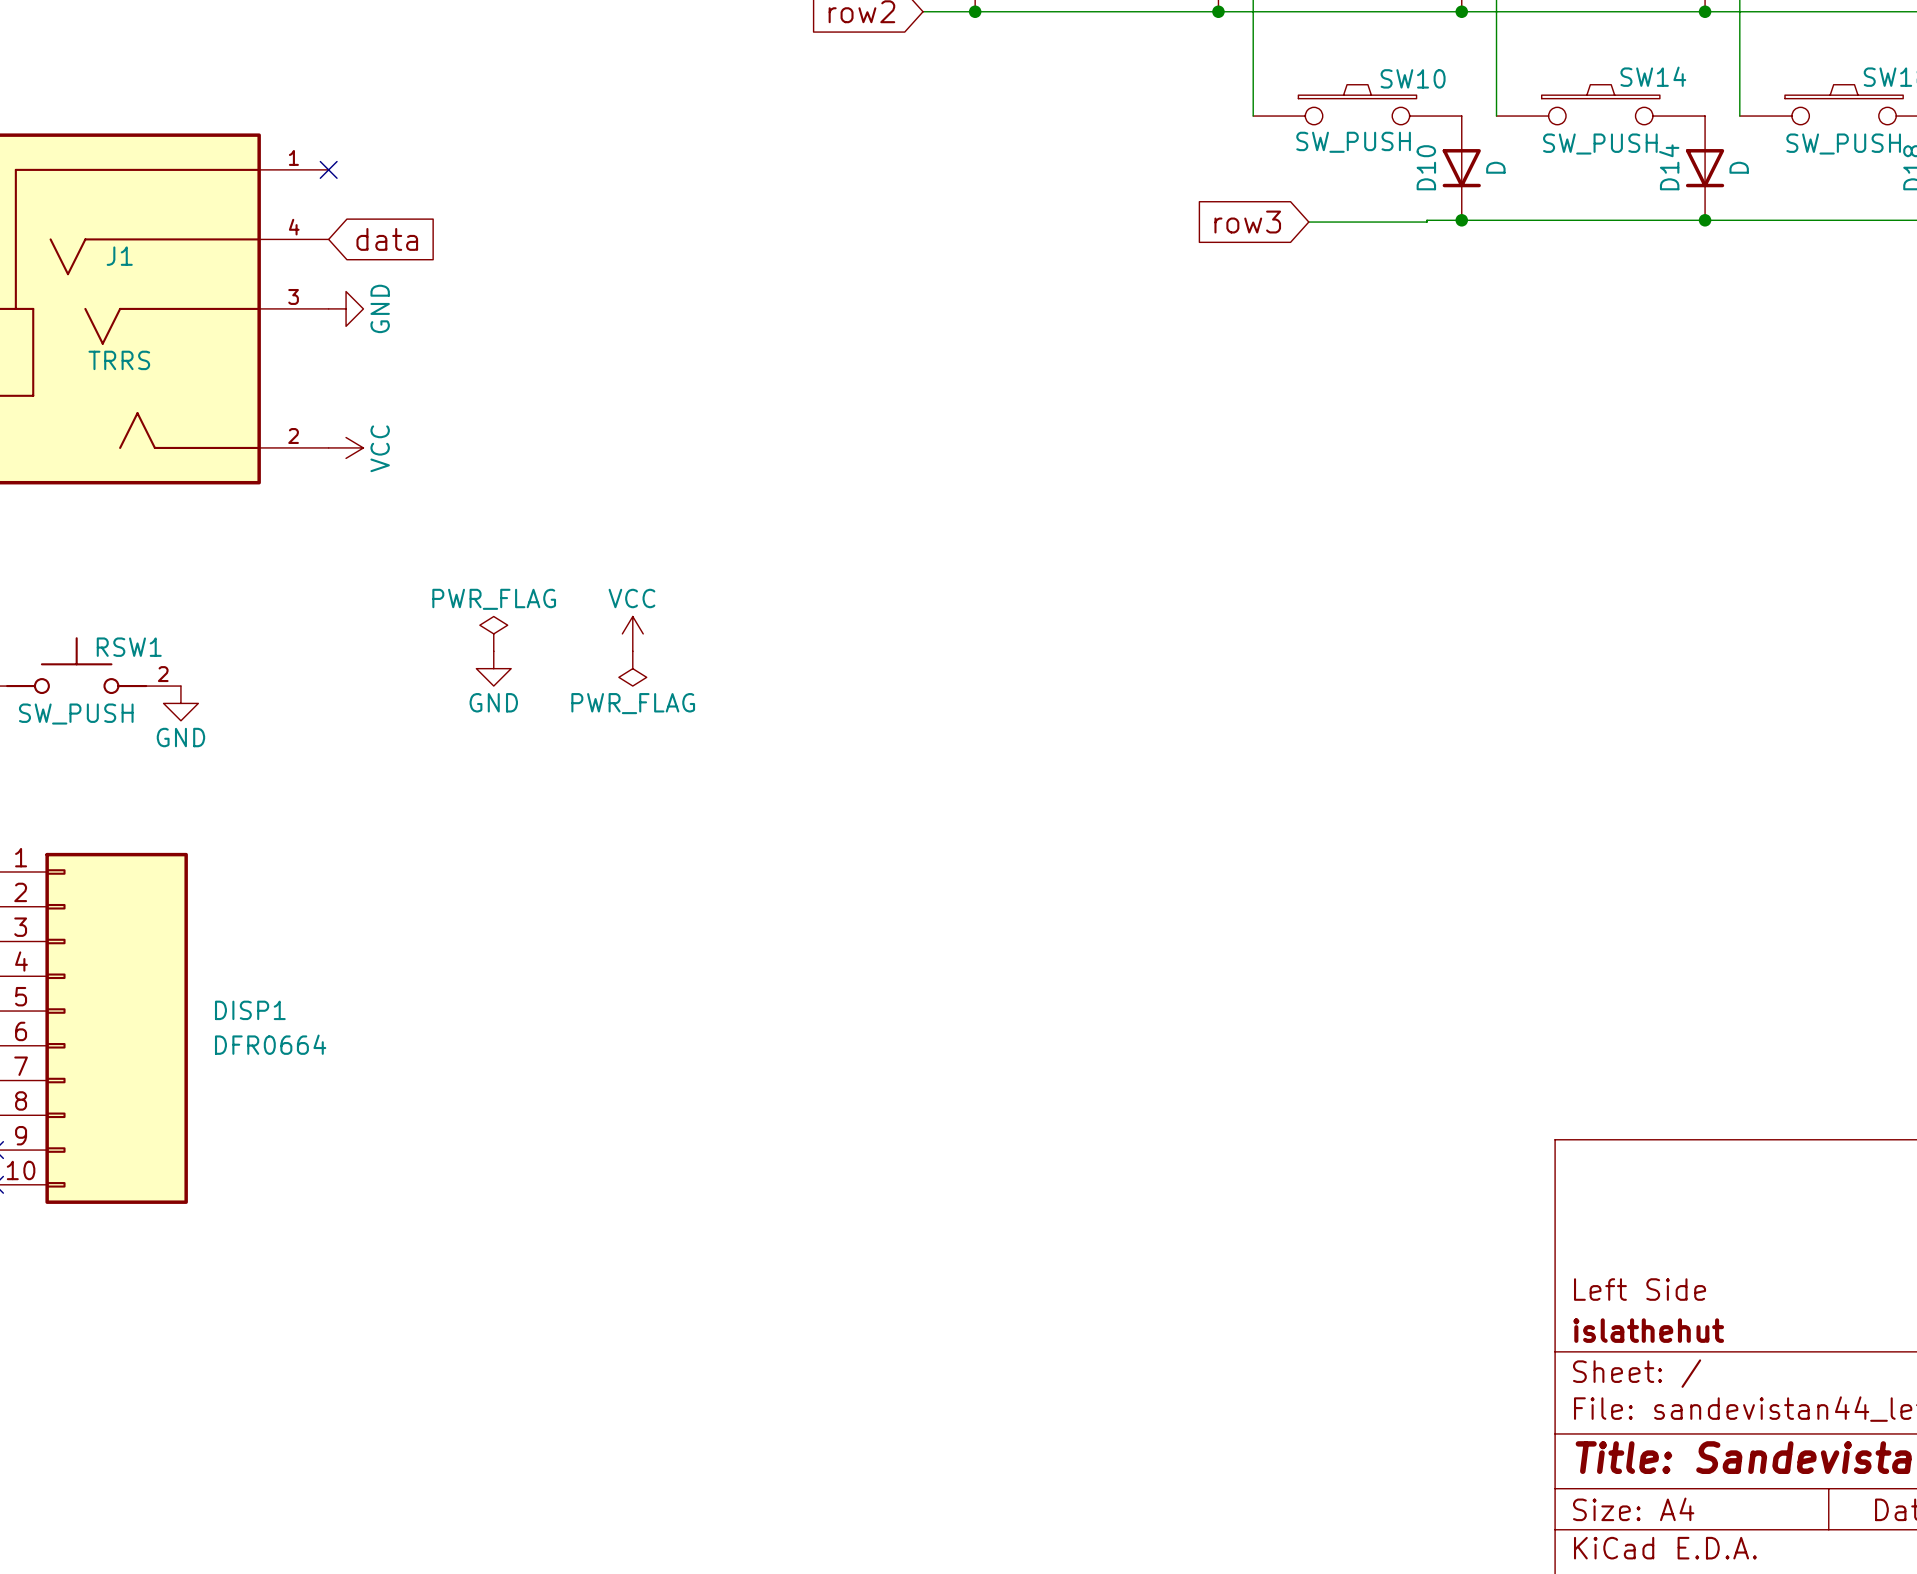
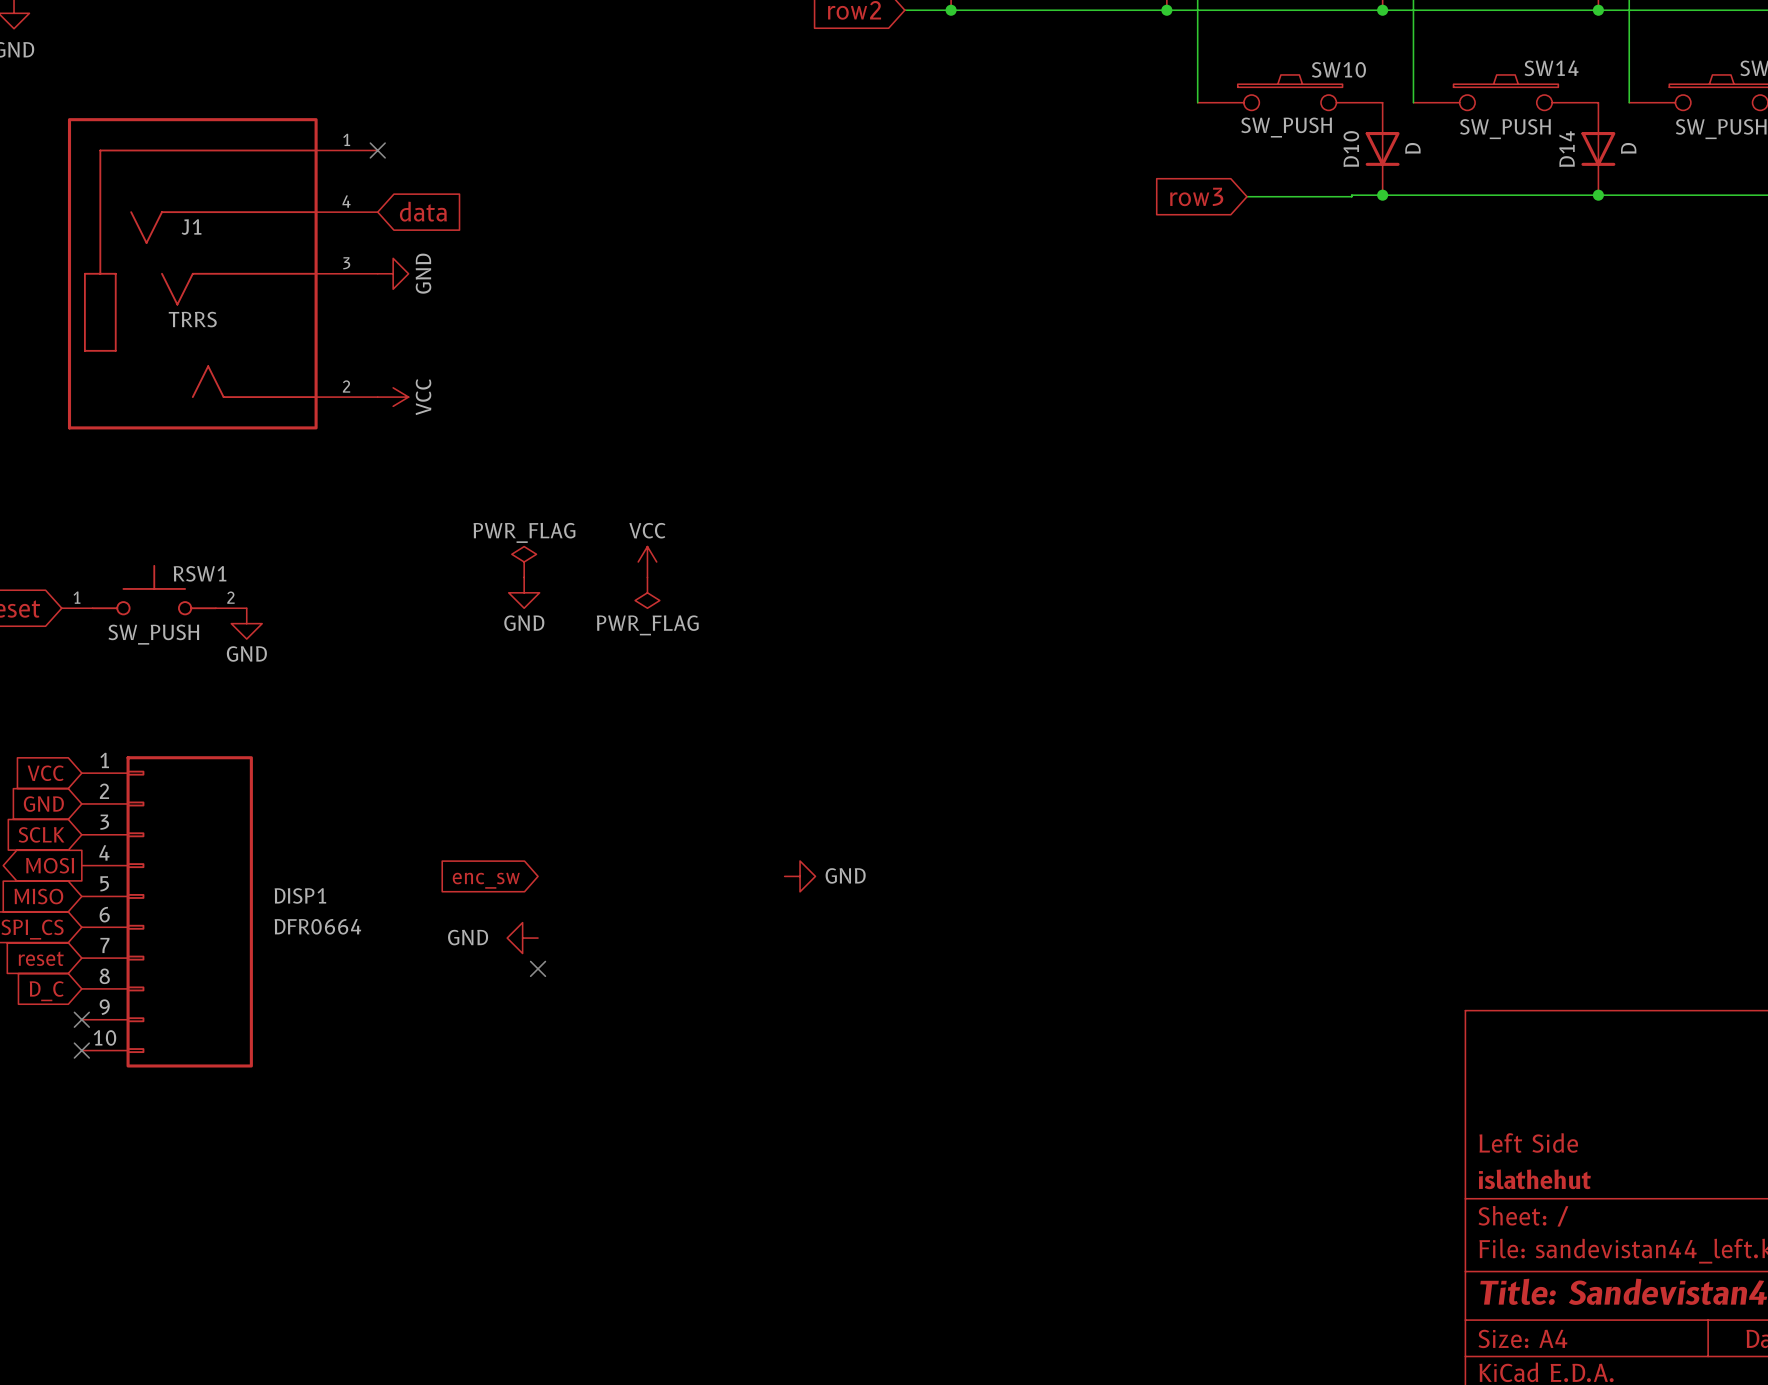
power symbol: none -> GND (800, 876)
global label: none -> enc_sw (486, 880)
power symbol: none -> GND (522, 938)
no-connect mark: none -> (538, 968)

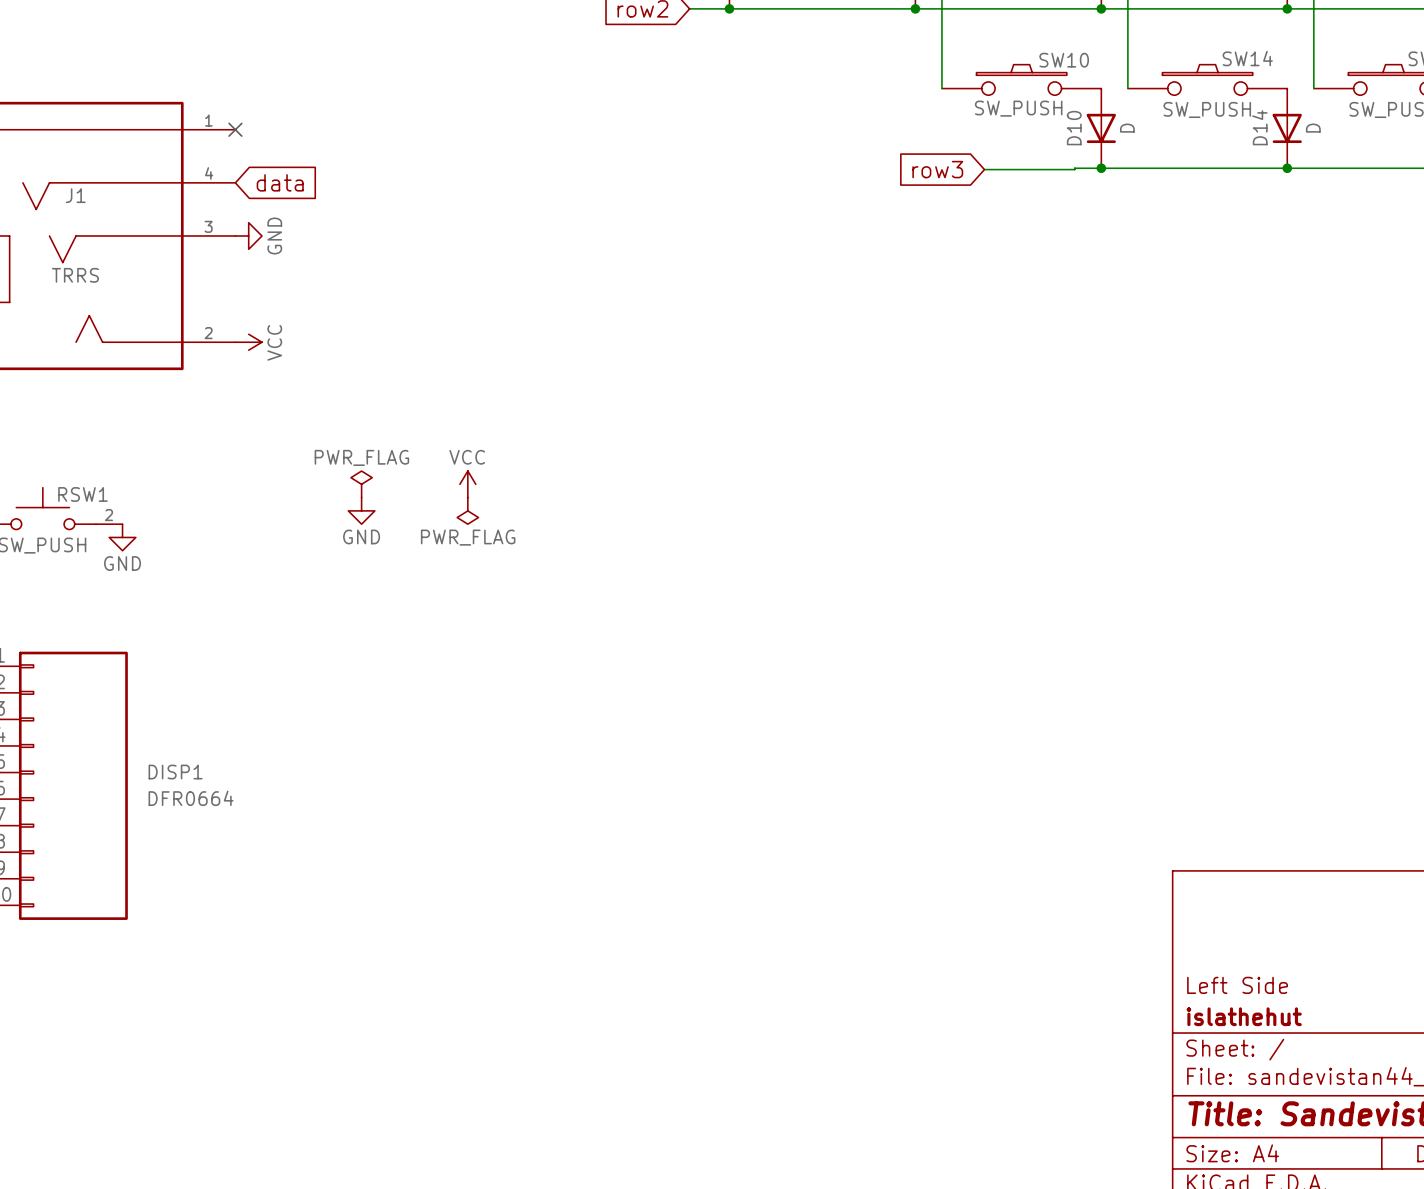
power symbol: GND (800, 876) -> none
global label: enc_sw (486, 880) -> none
power symbol: GND (522, 938) -> none
no-connect mark: (538, 968) -> none

